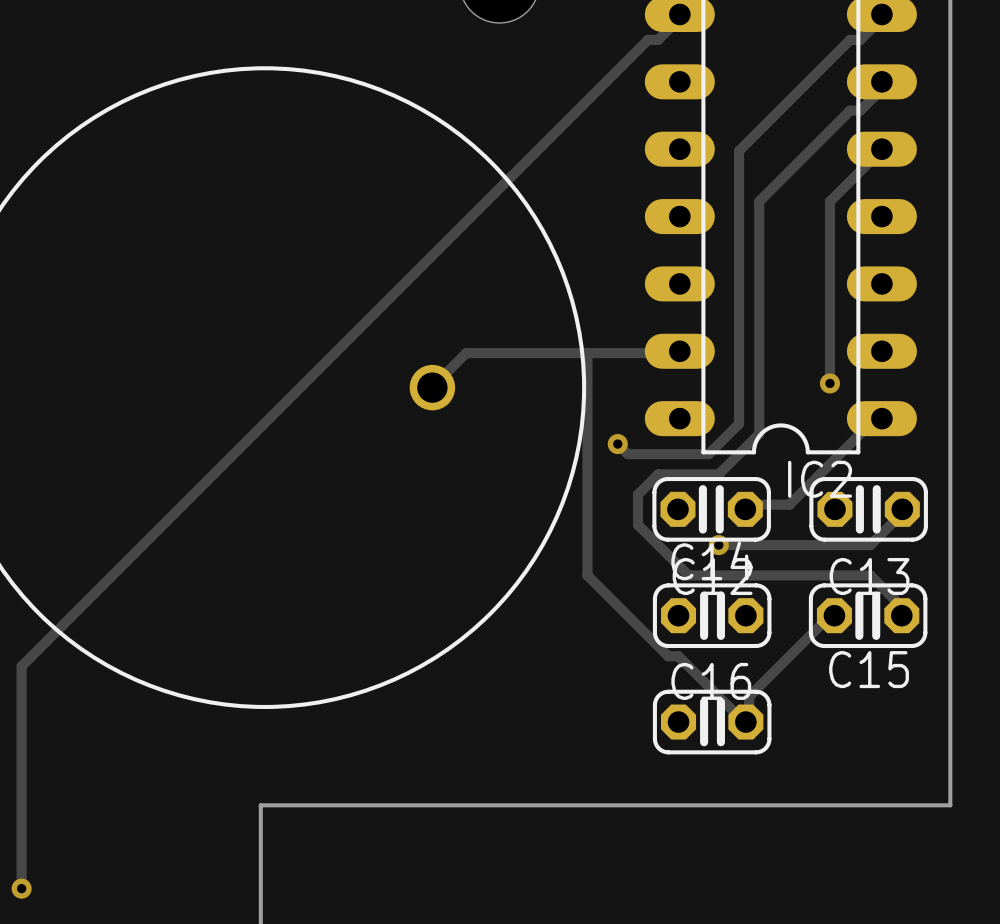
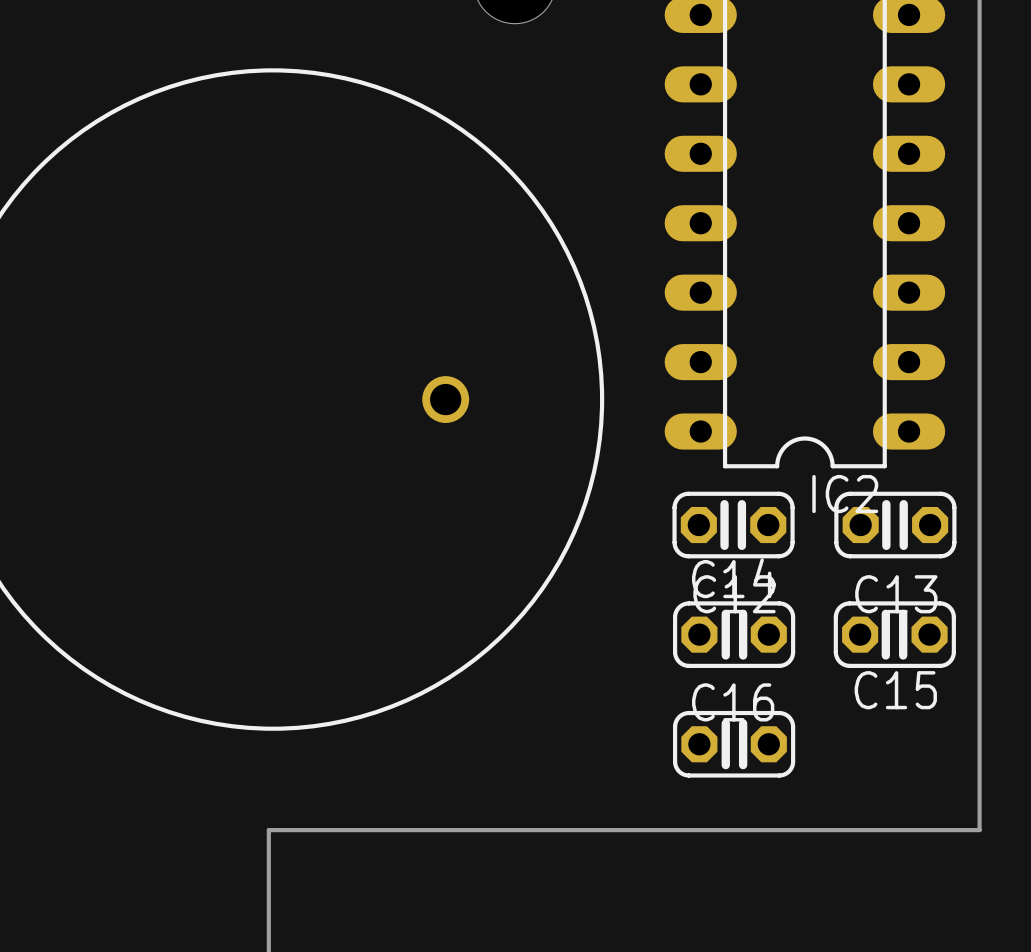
track: (679, 14) (678, 19) (658, 39) (648, 39) (21, 666) (21, 888) -> none
track: (881, 14) (880, 19) (860, 39) (850, 39) (739, 151) (739, 423) (708, 454) (627, 454) (617, 444) -> none
track: (881, 81) (880, 90) (860, 110) (850, 110) (759, 201) (759, 433) (718, 474) (658, 474) (637, 494) (637, 524) (688, 575) (870, 575) (900, 605) (901, 615) -> none
track: (881, 149) (829, 201) (829, 383) -> none
track: (679, 351) (678, 353) (466, 353) (432, 387) -> none
track: (587, 353) (587, 575) (668, 656) (678, 656) (745, 722) (749, 716) (749, 696) (829, 615) (834, 615) -> none
via: (829, 383) -> none
track: (881, 418) (880, 413) (789, 504) (749, 504) (745, 509) -> none
via: (617, 444) -> none
track: (902, 509) (900, 514) (870, 545) (718, 545) -> none
via: (718, 545) -> none
via: (21, 888) -> none

